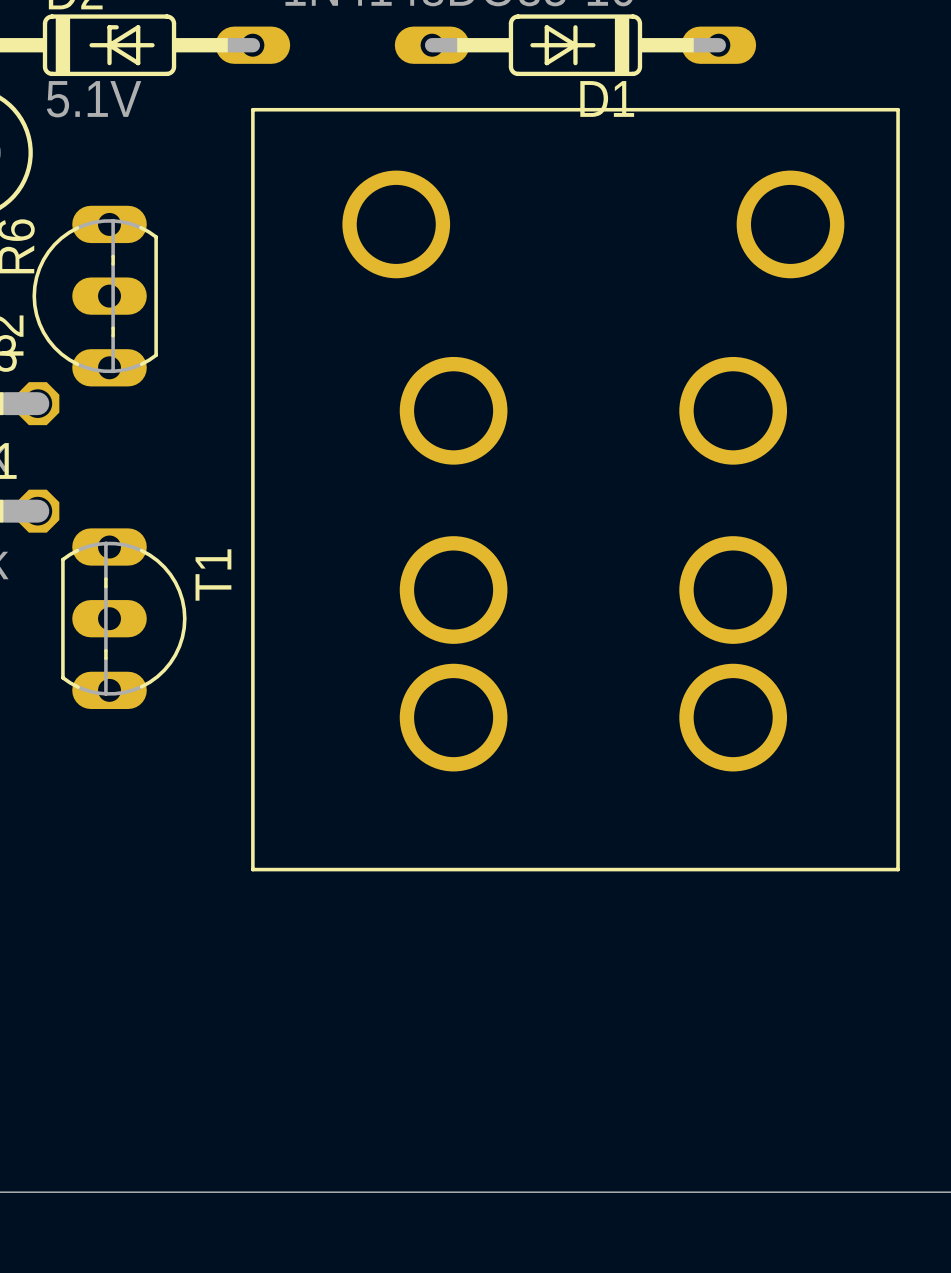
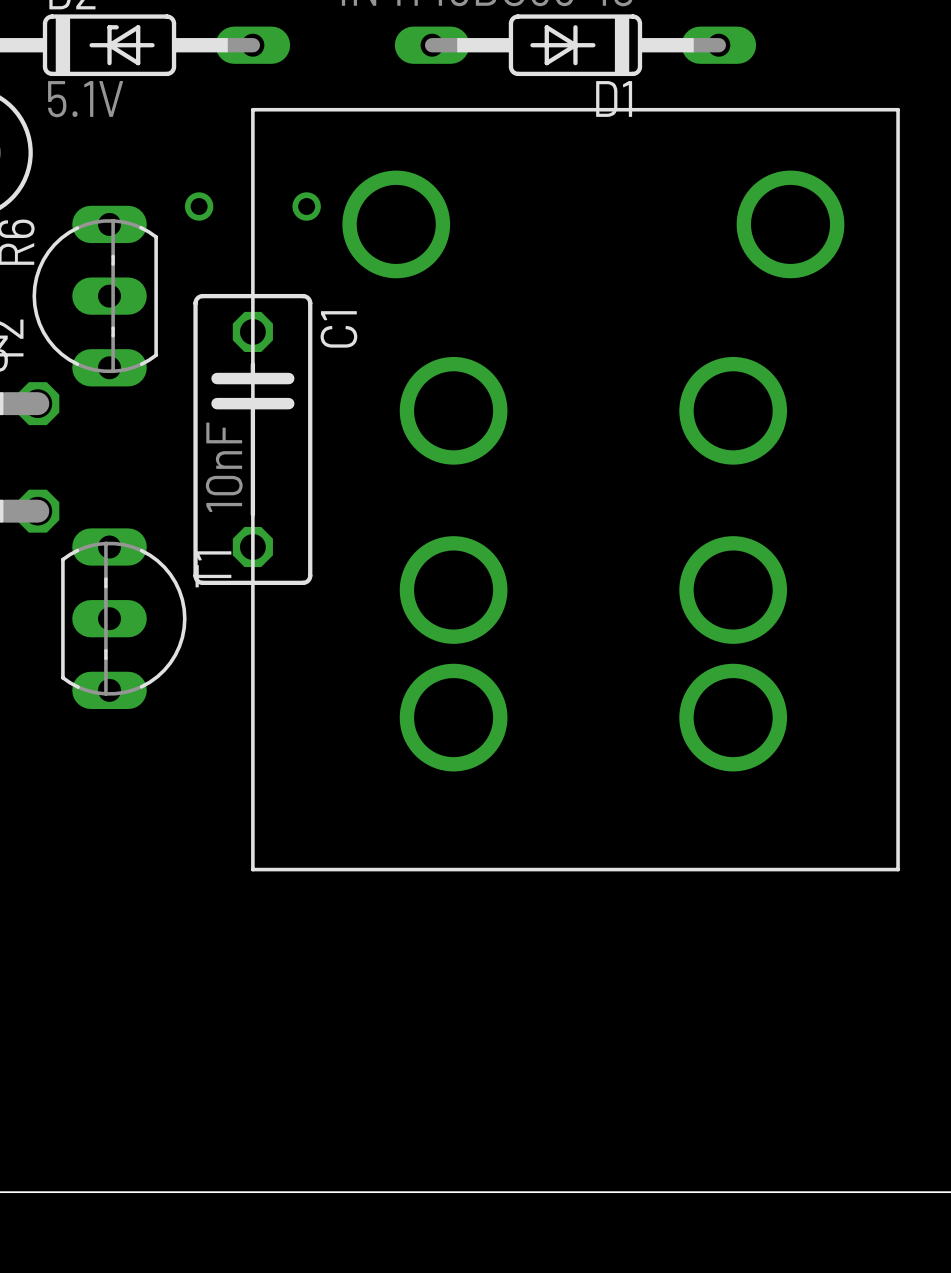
via: none -> (199, 206)
via: none -> (306, 206)
C1: none -> 10nF (252, 439)

